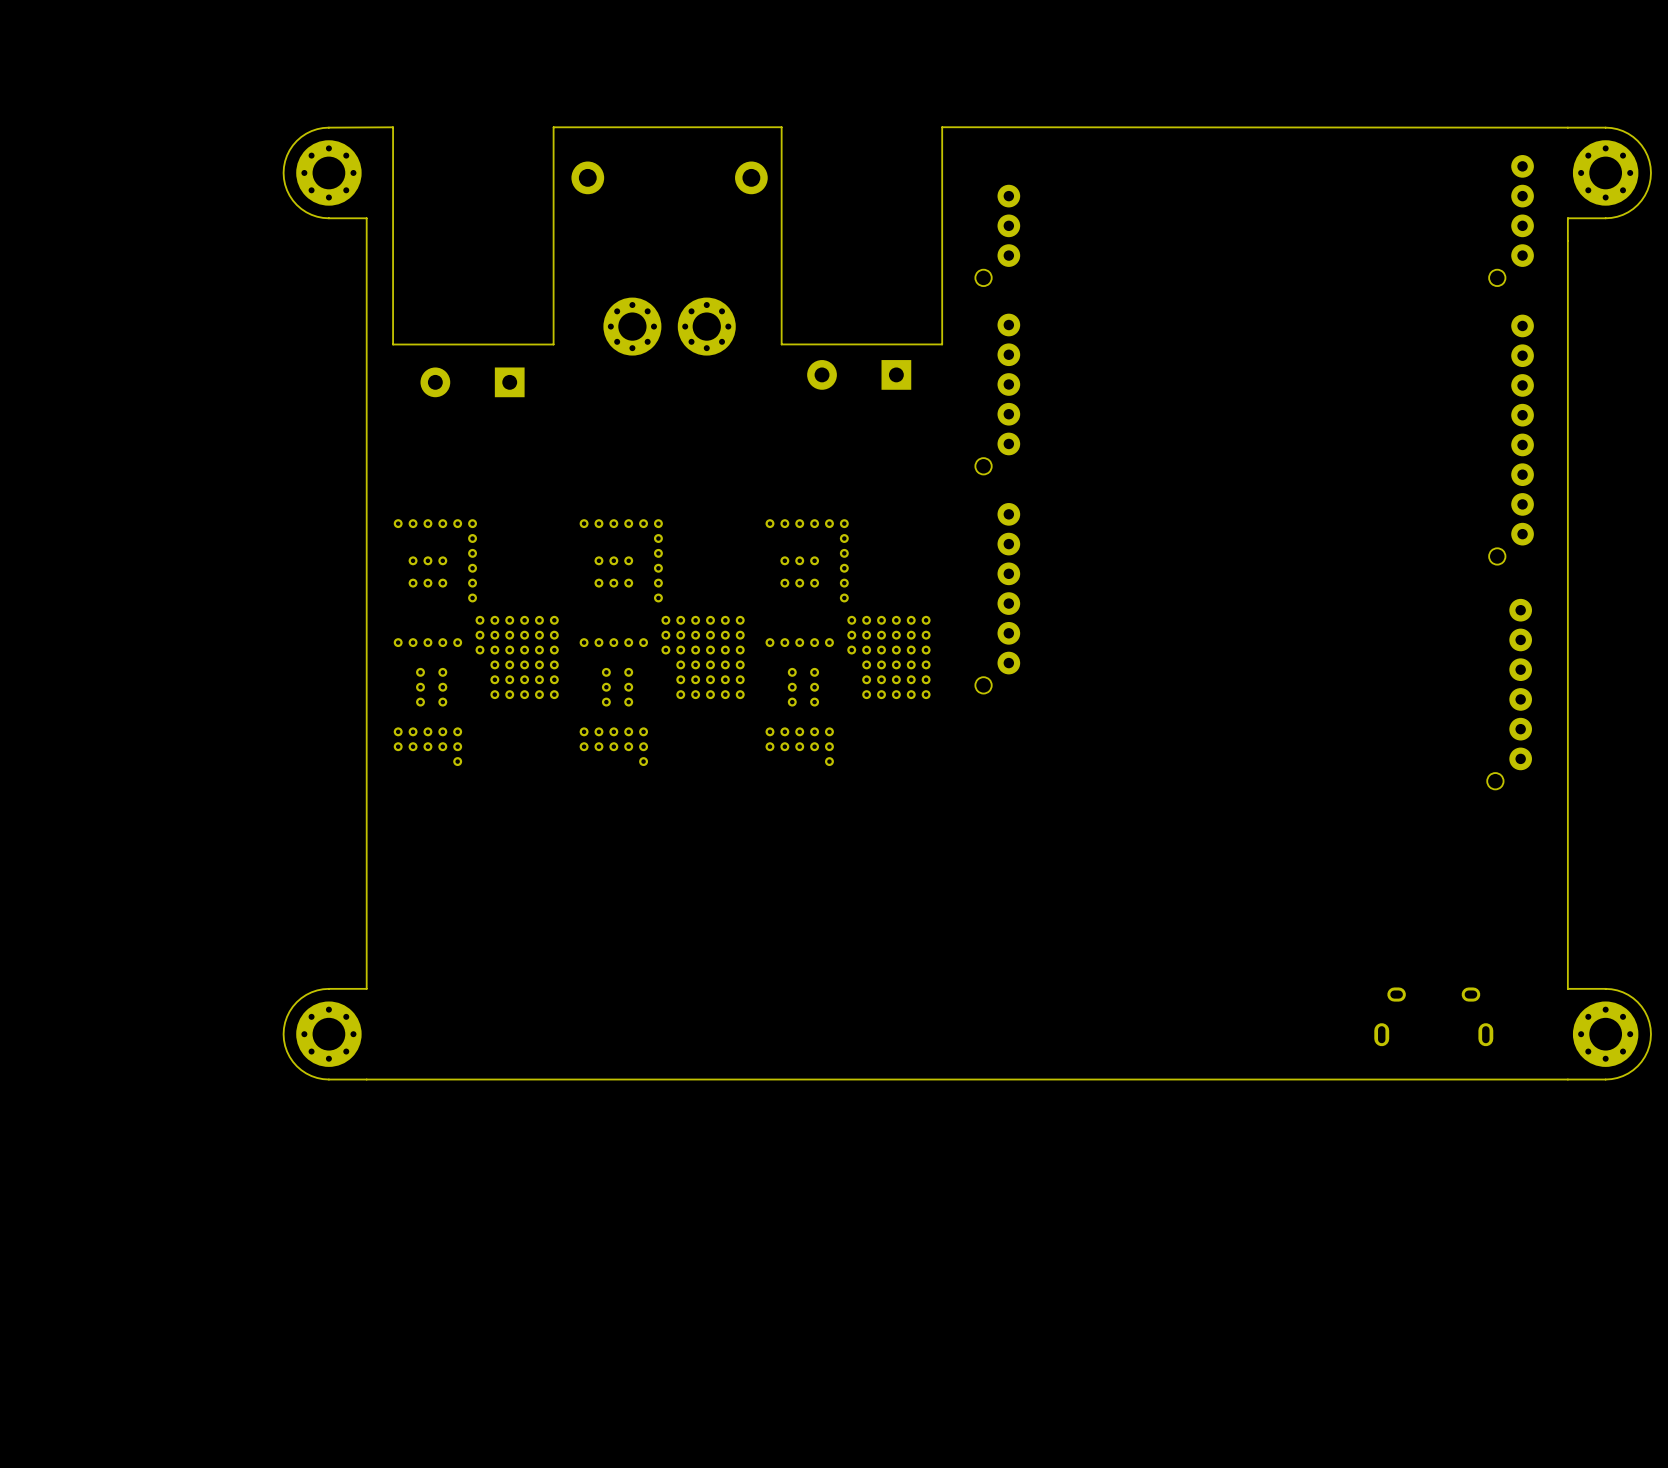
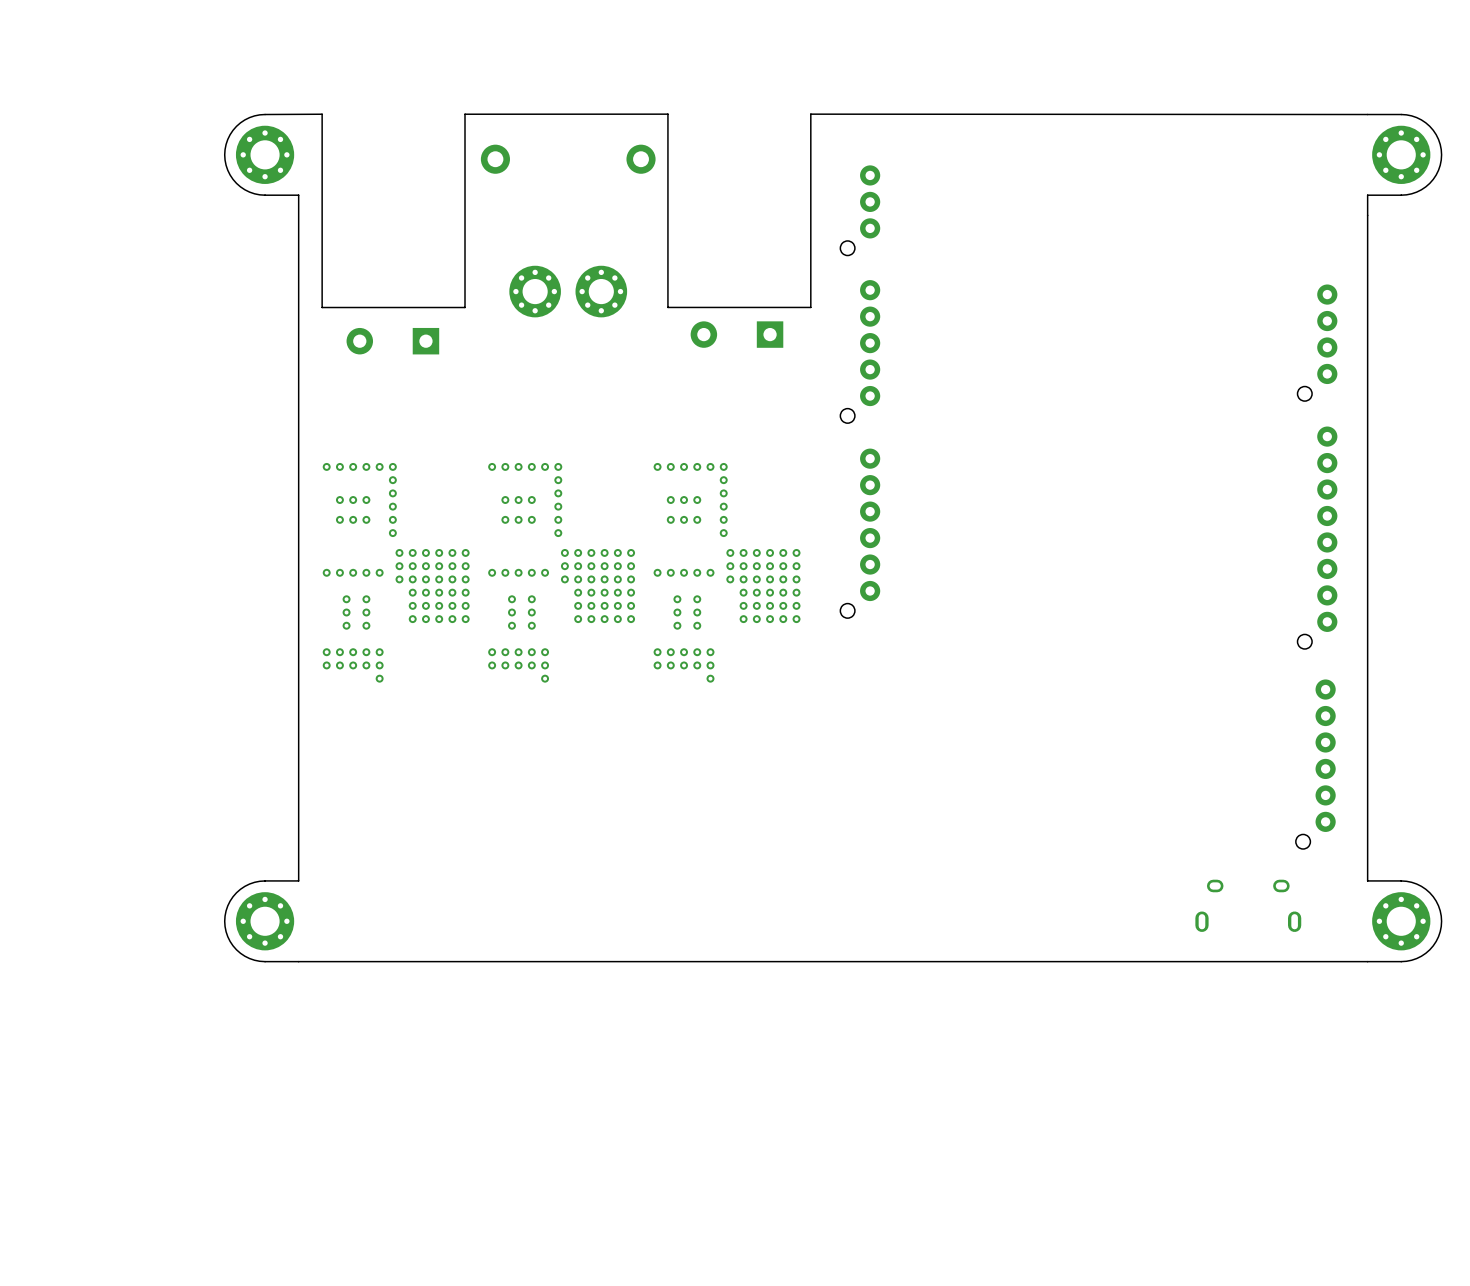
part position: (1511, 220) -> (1317, 342)
part position: (1511, 439) -> (1317, 537)
part position: (1509, 694) -> (1315, 764)

